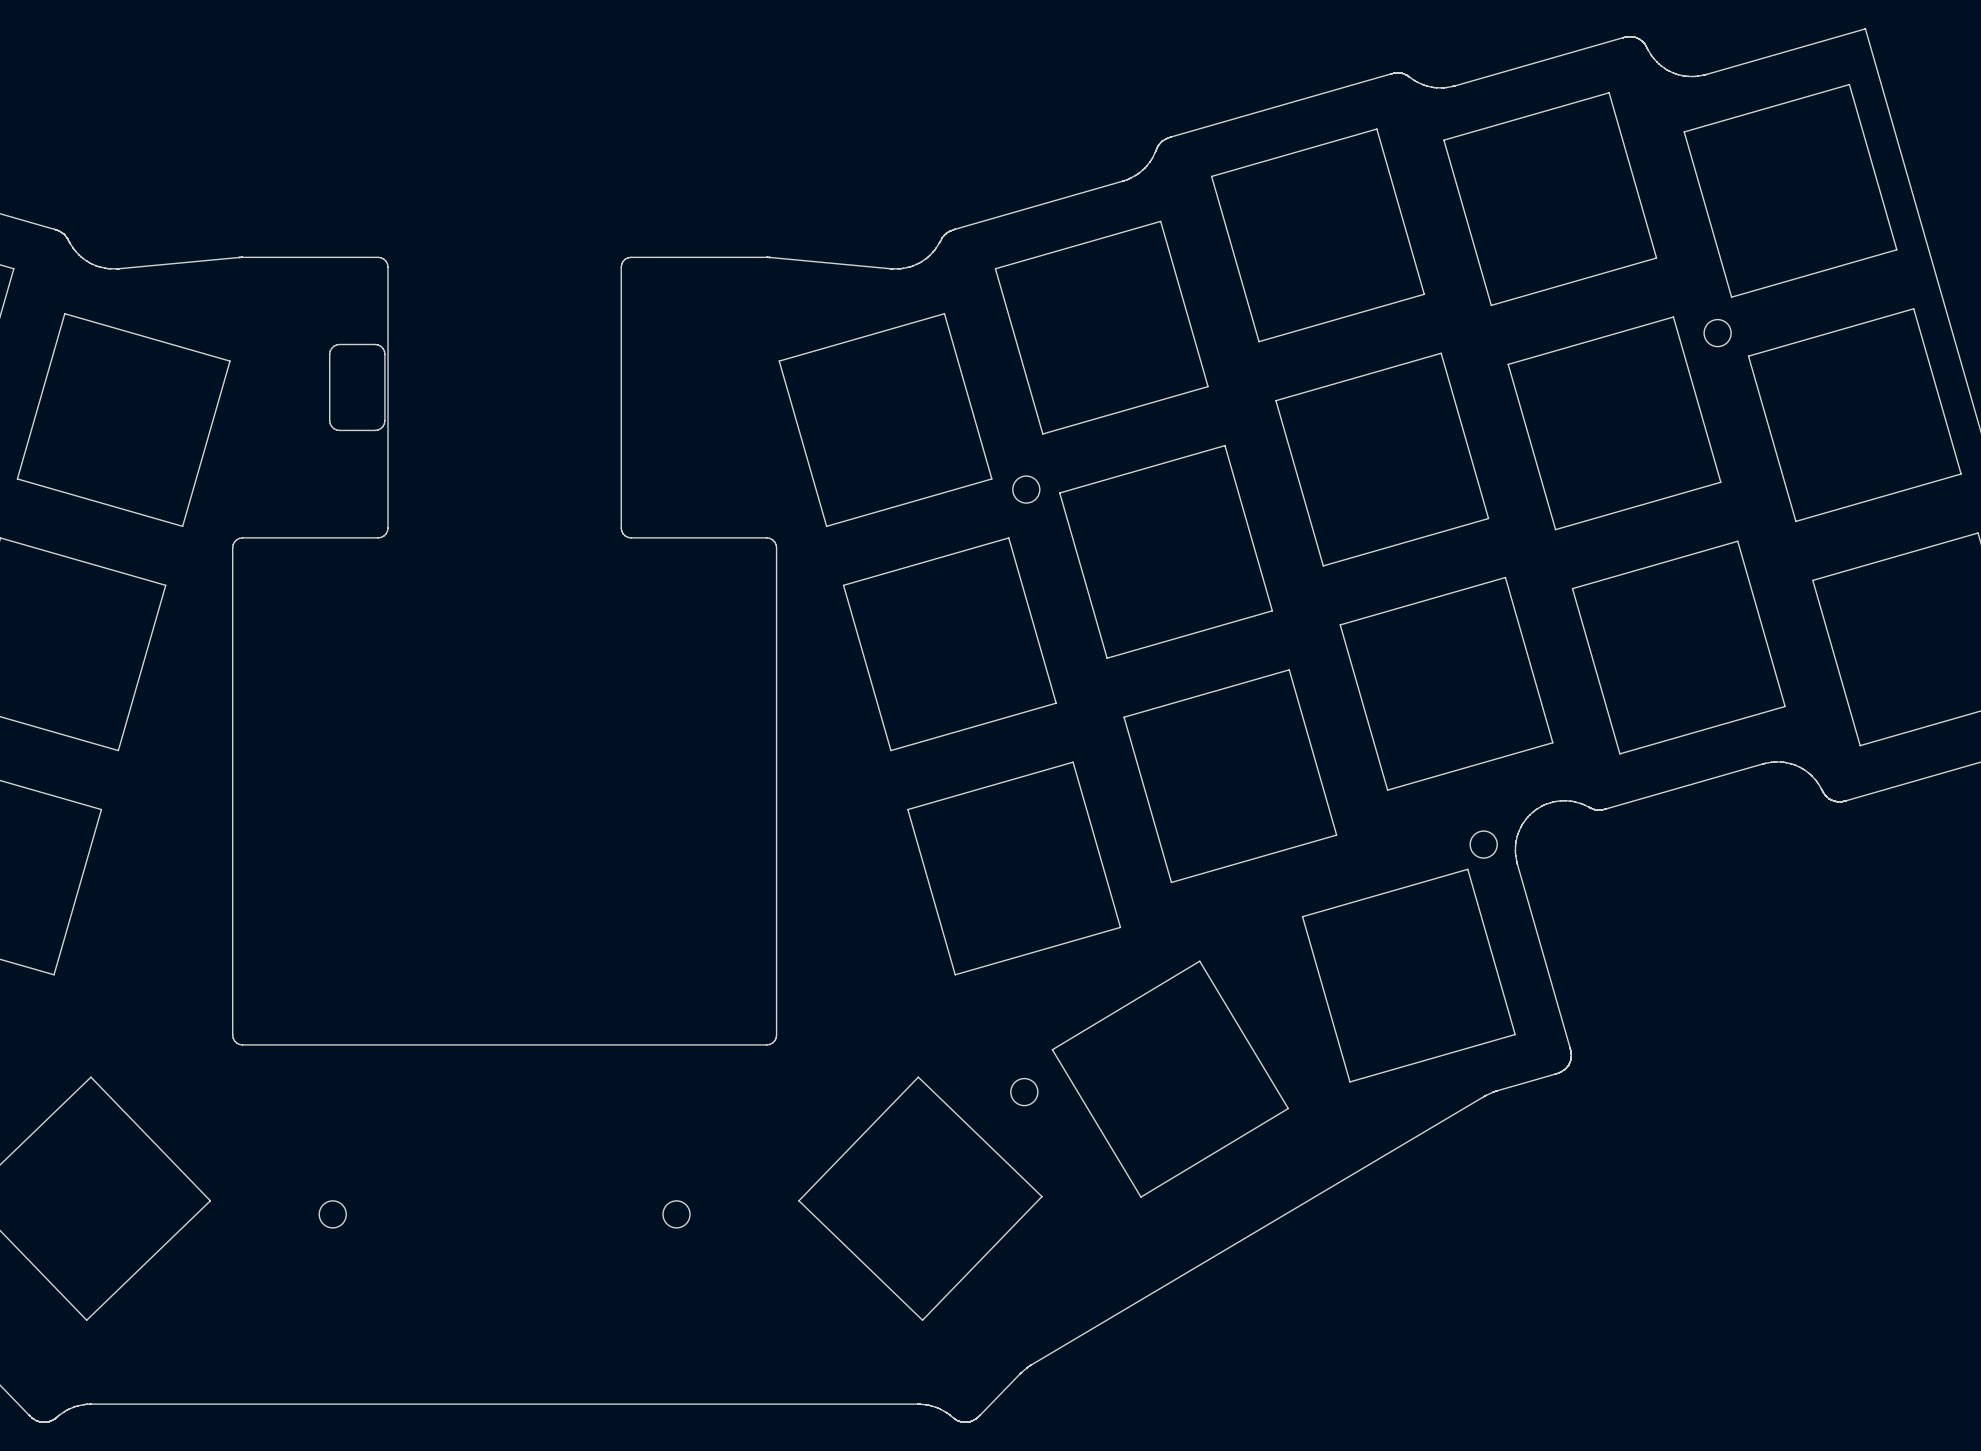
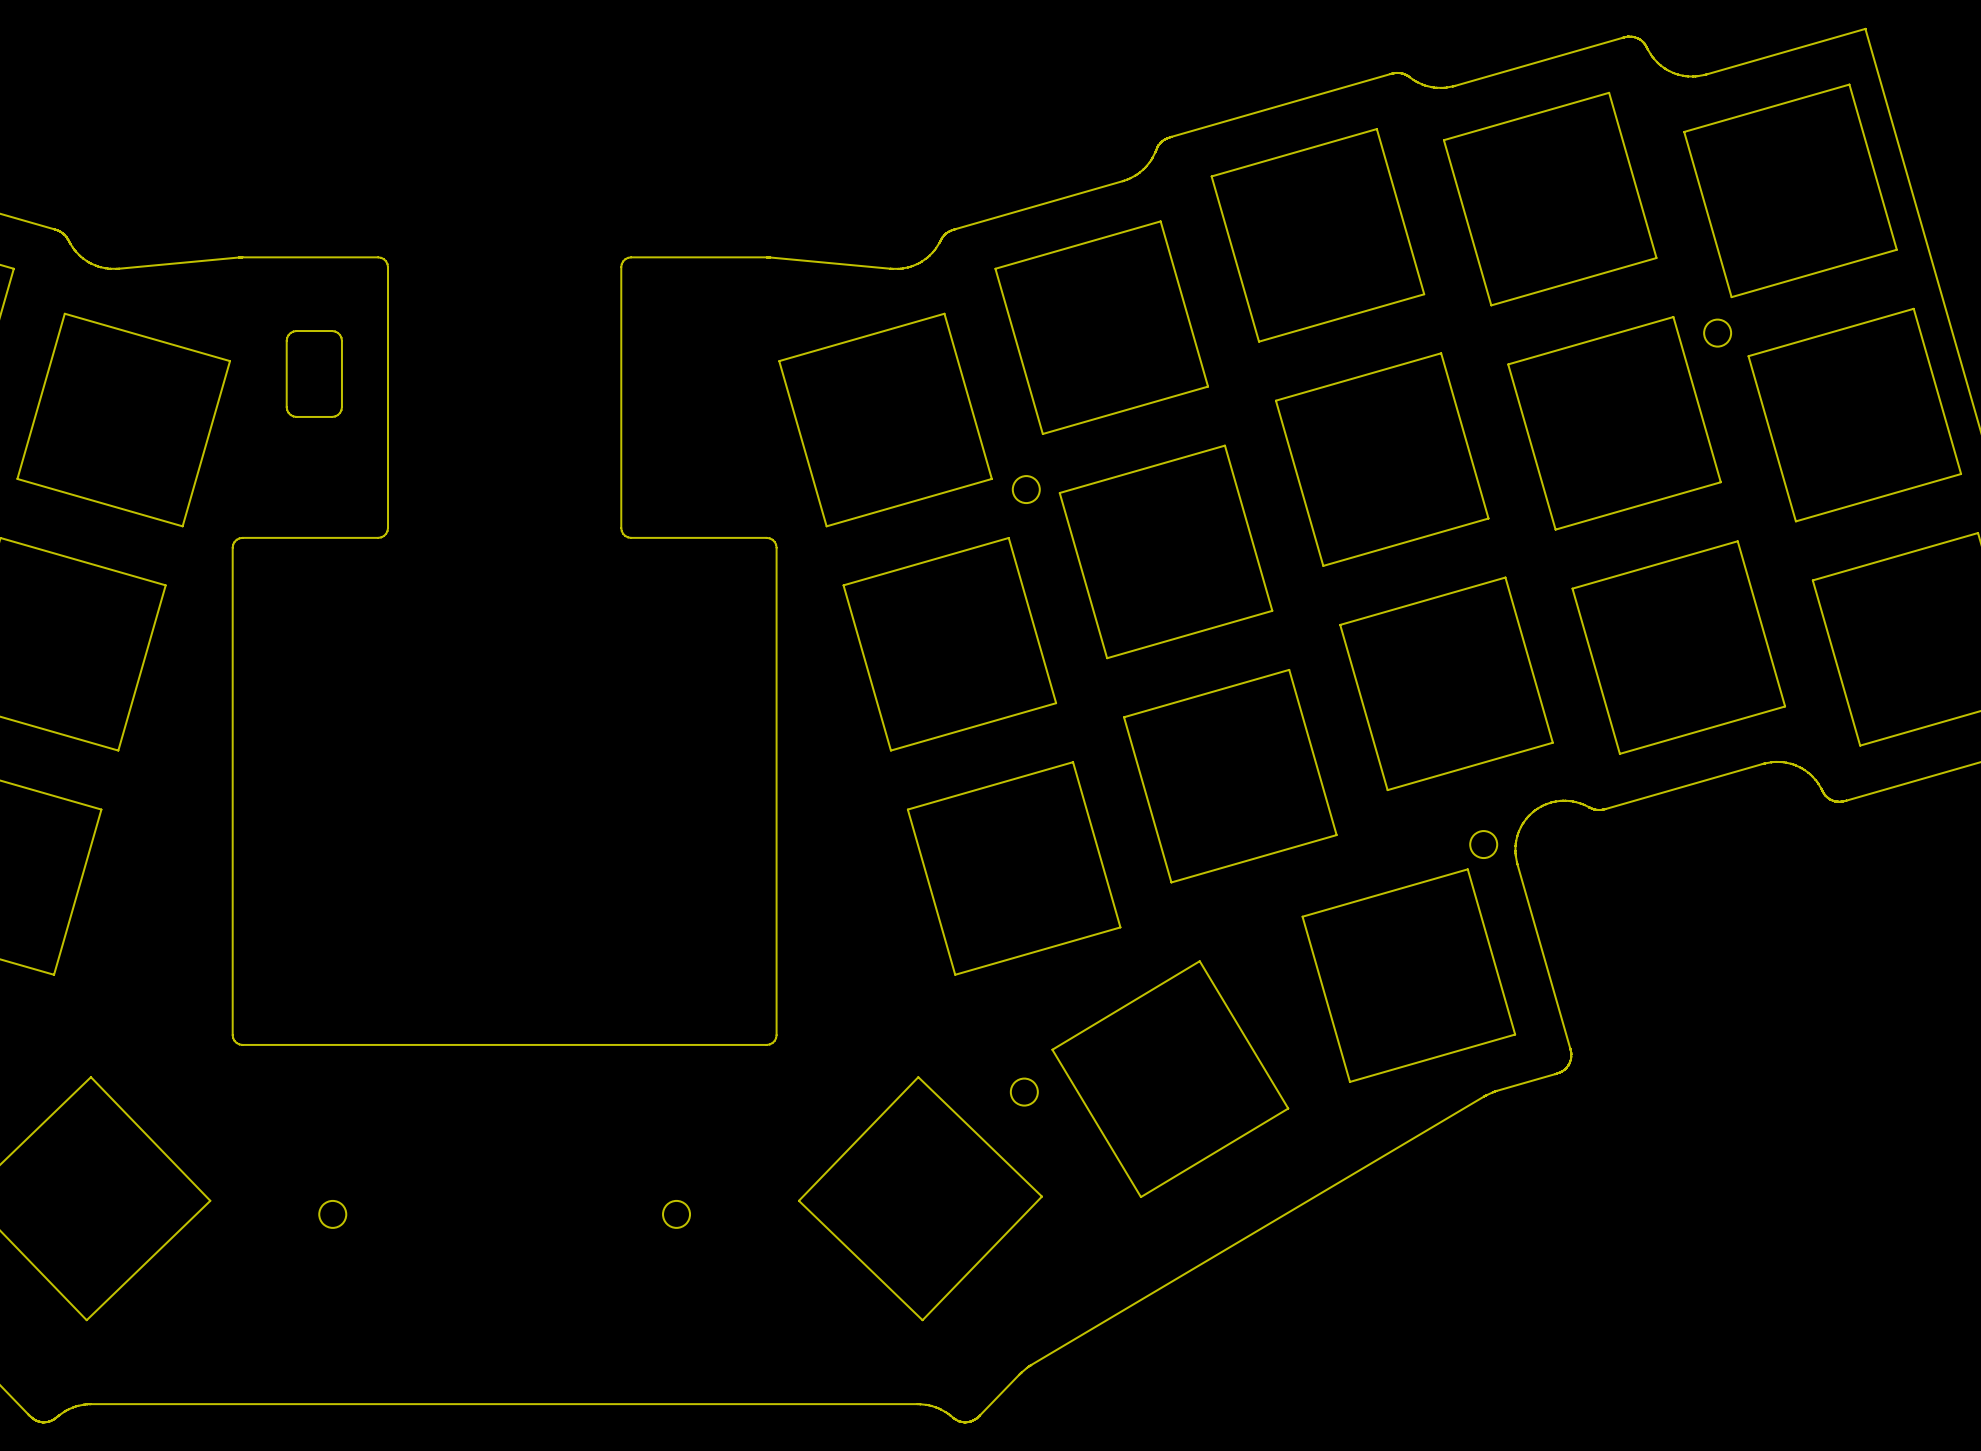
board edge: (375, 344) (380, 346) (384, 354) (384, 423) (380, 428) (375, 430) (336, 429) (331, 426) (329, 420) (330, 351) (333, 346) (339, 344) (375, 344) -> (332, 331) (337, 332) (341, 340) (341, 410) (337, 415) (332, 416) (293, 416) (288, 412) (286, 407) (287, 337) (290, 332) (296, 331) (332, 331)

